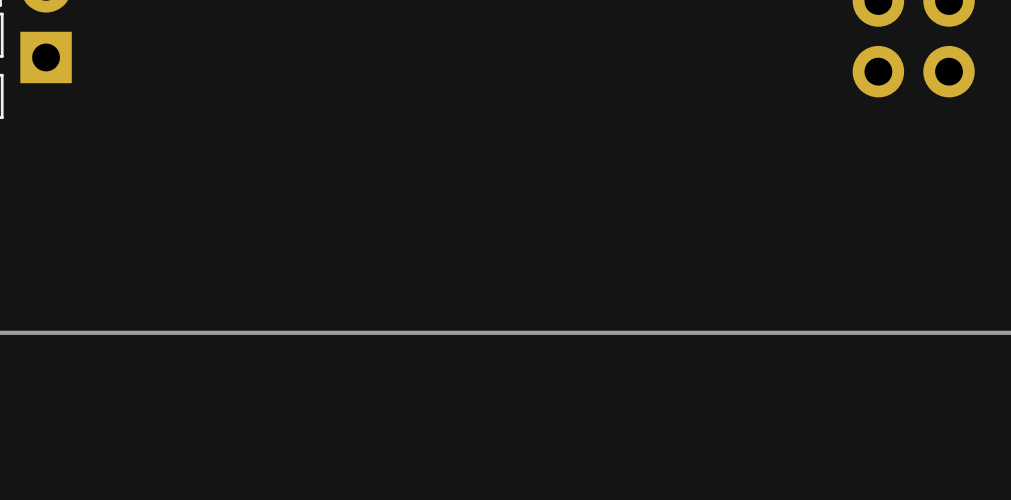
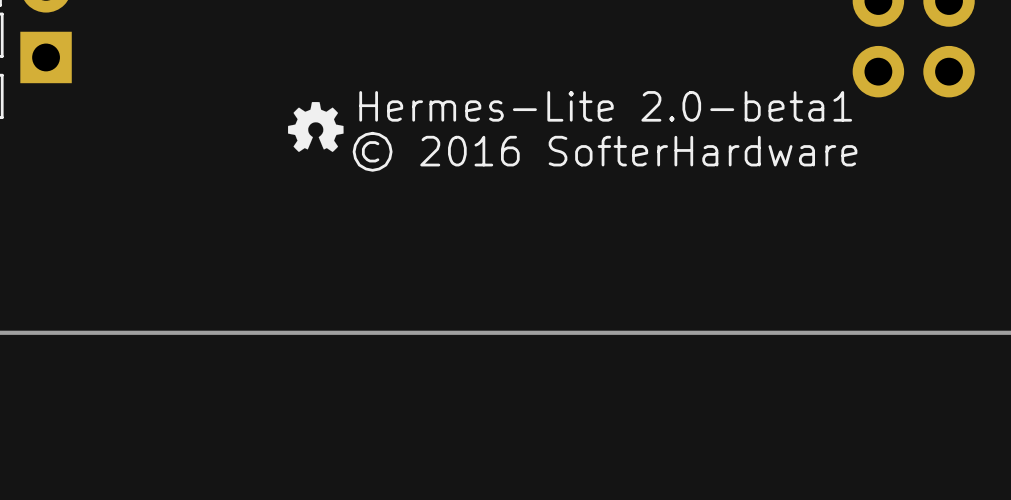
drawing: none -> [288, 102, 344, 152]
text: none -> Hermes-Lite 2.0-beta1 (605, 106)
text: none -> © 2016 SofterHardware (605, 151)

